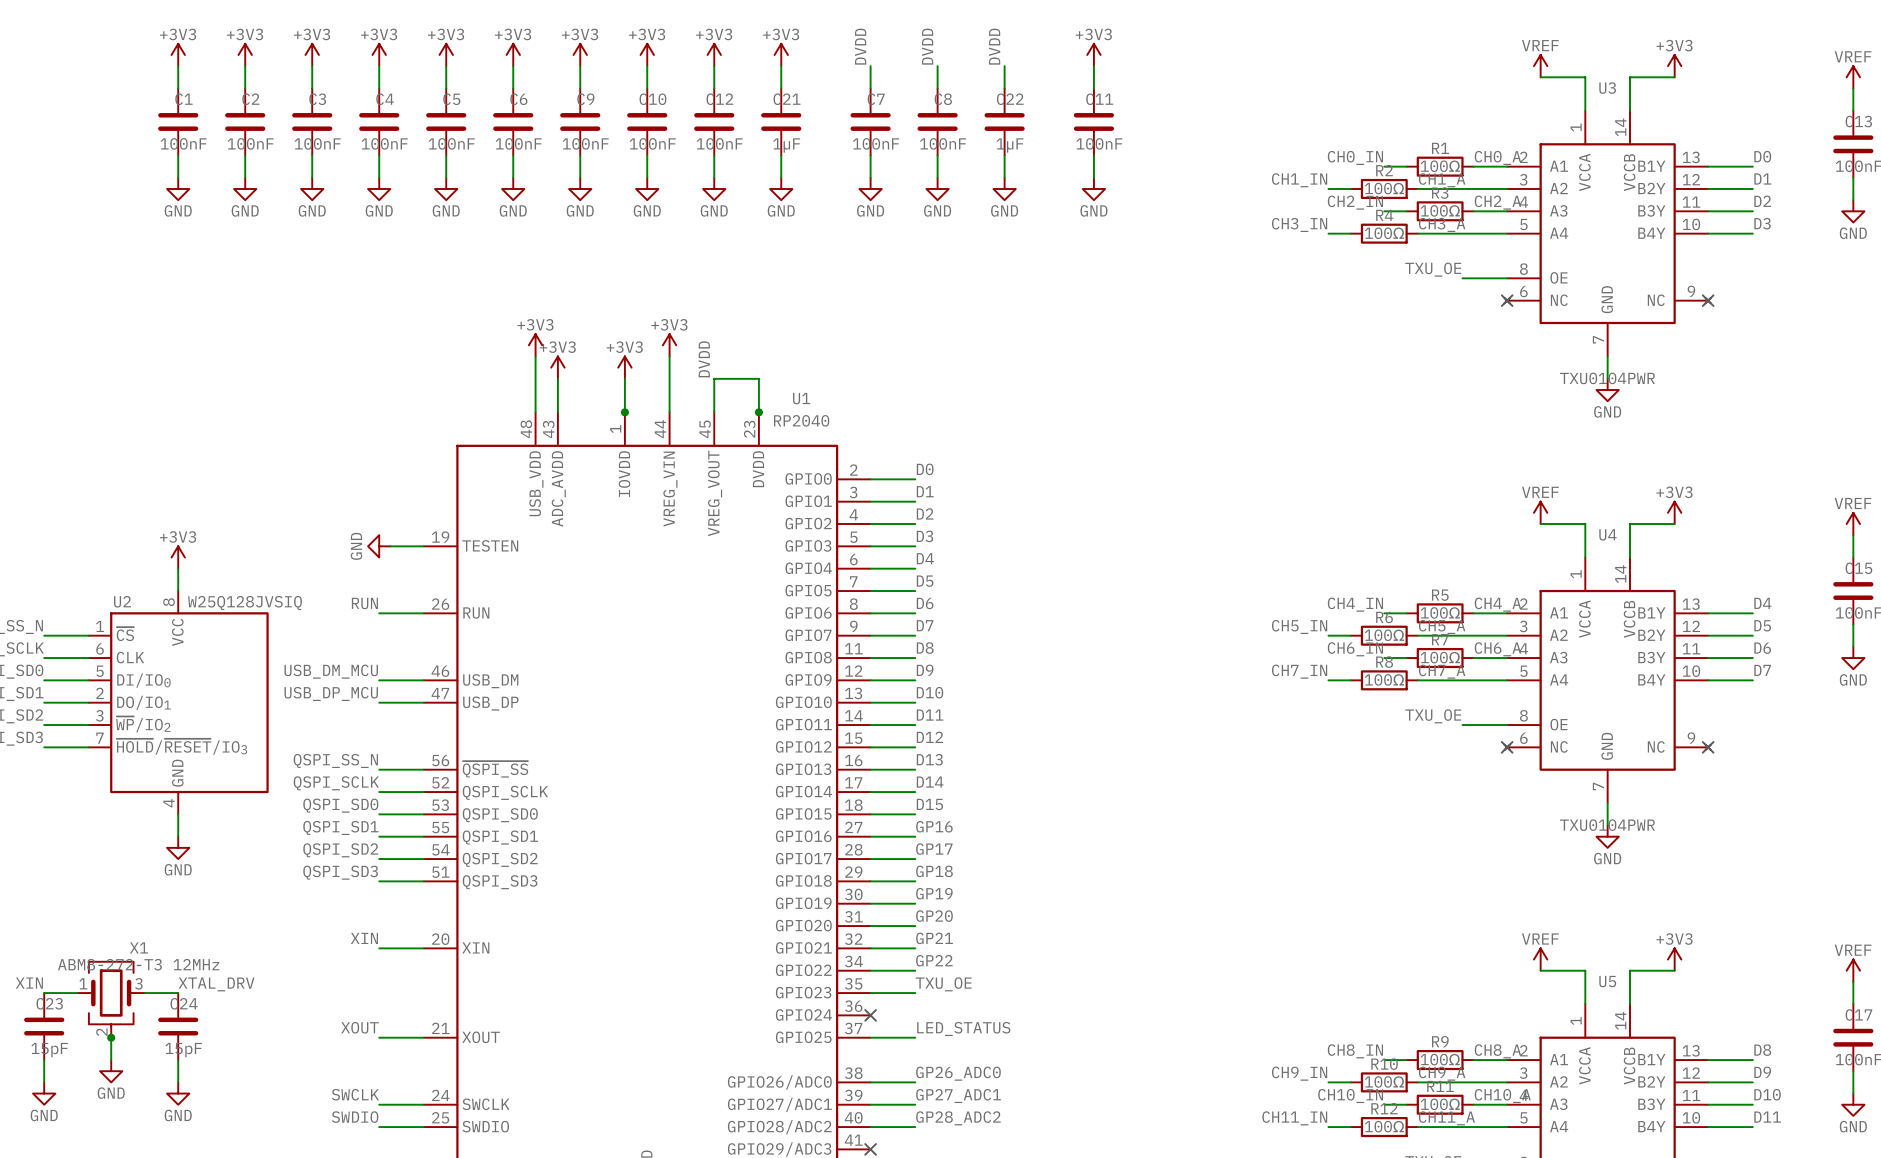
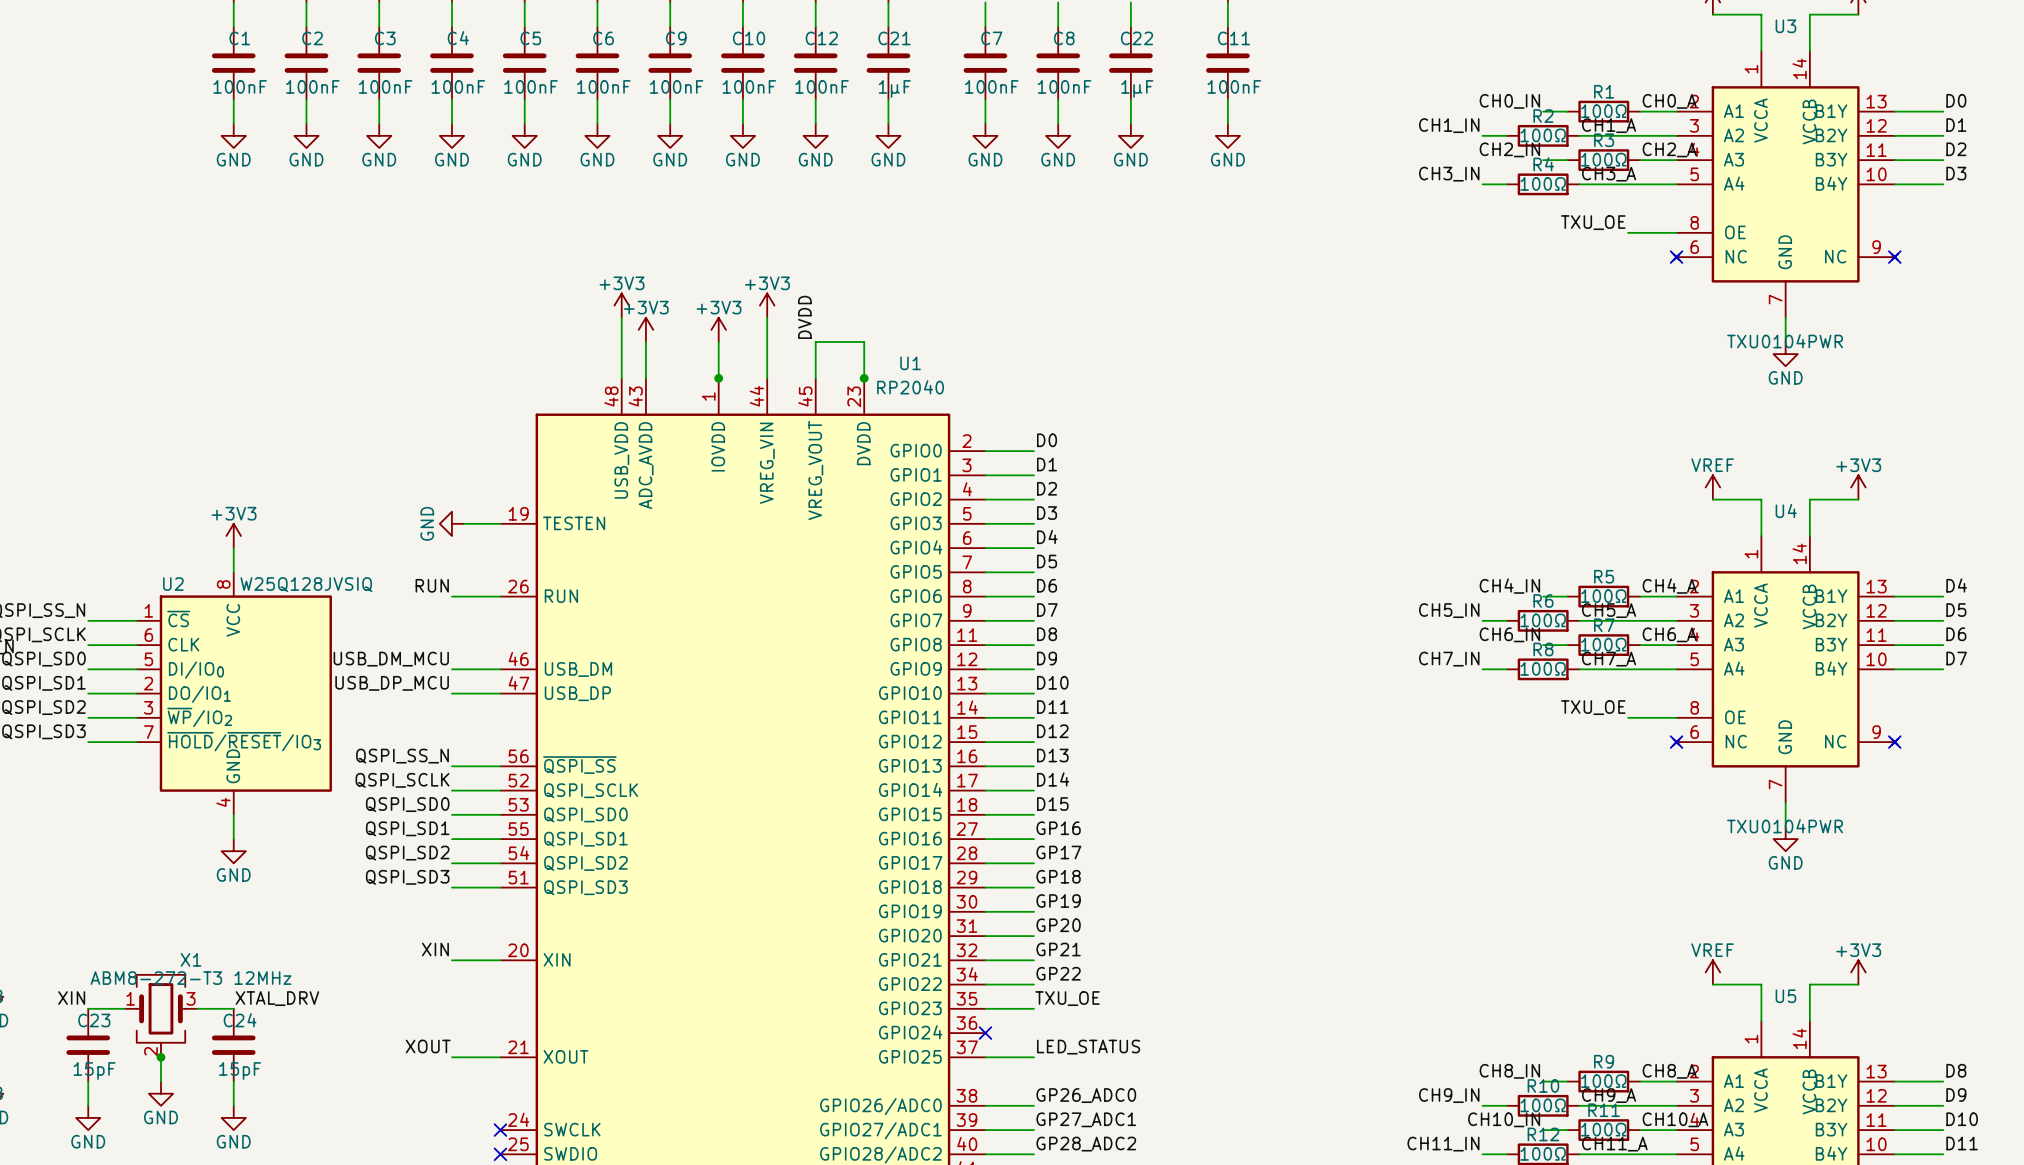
label: SWCLK (355, 1094) -> none
wire: (379, 1104) (423, 1104) -> none
no-connect mark: none -> (500, 1130)
label: SWDIO (355, 1117) -> none
wire: (379, 1127) (423, 1127) -> none
no-connect mark: none -> (500, 1154)

